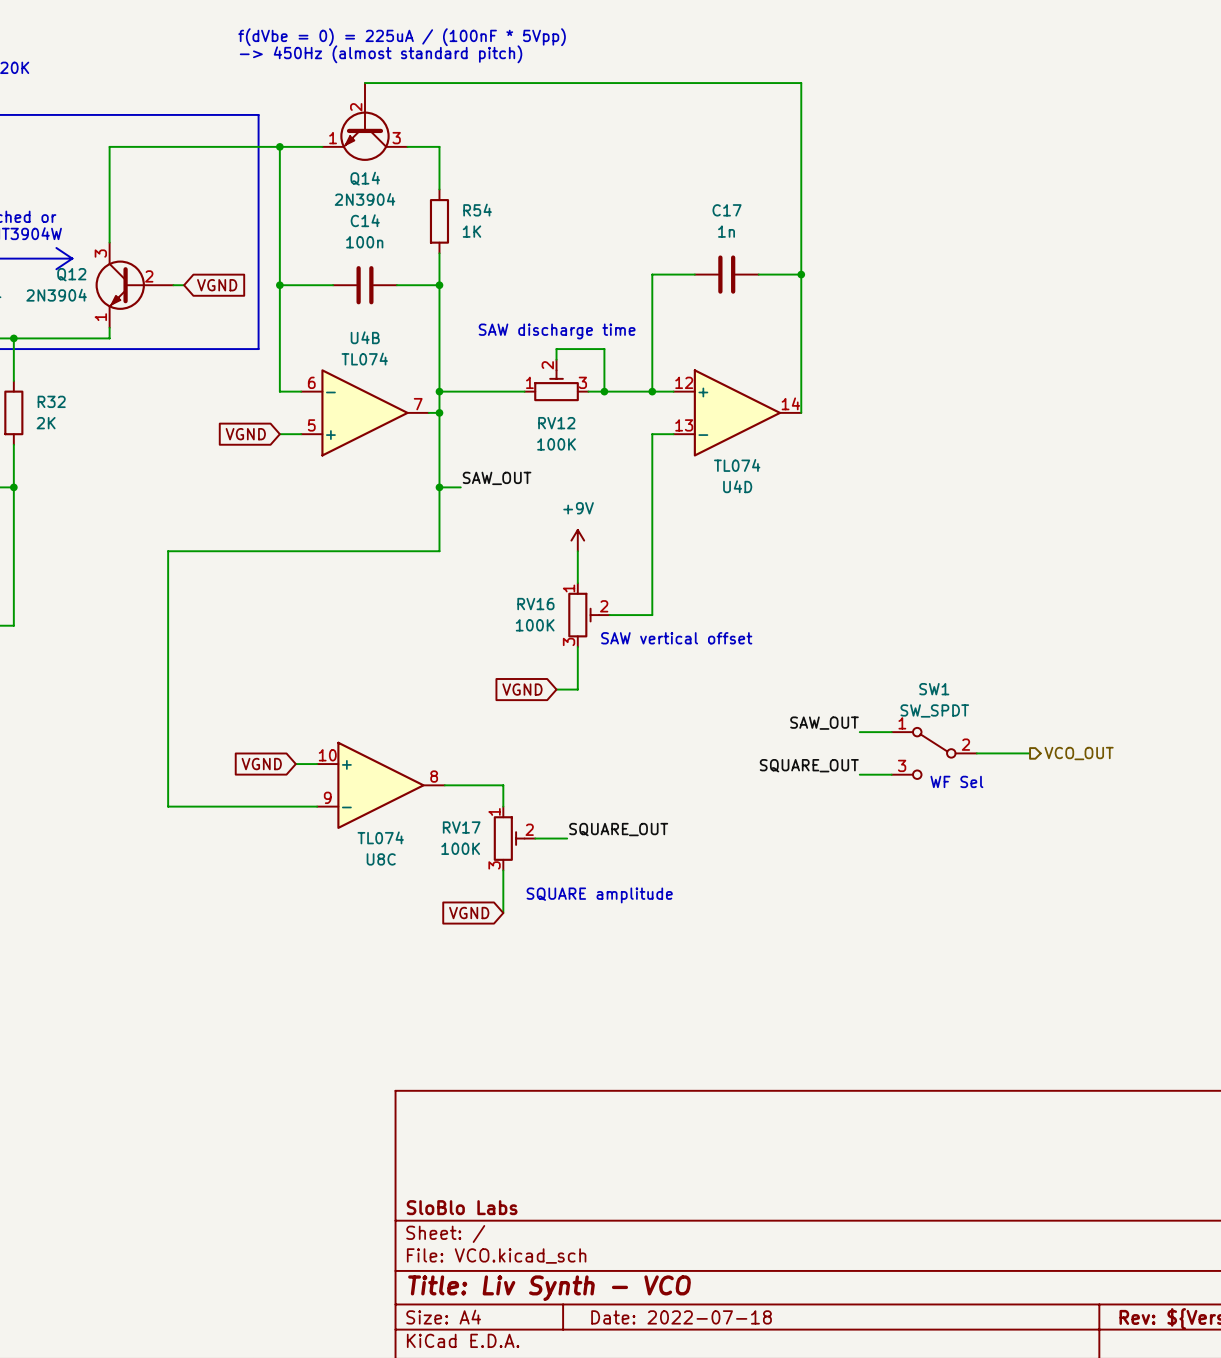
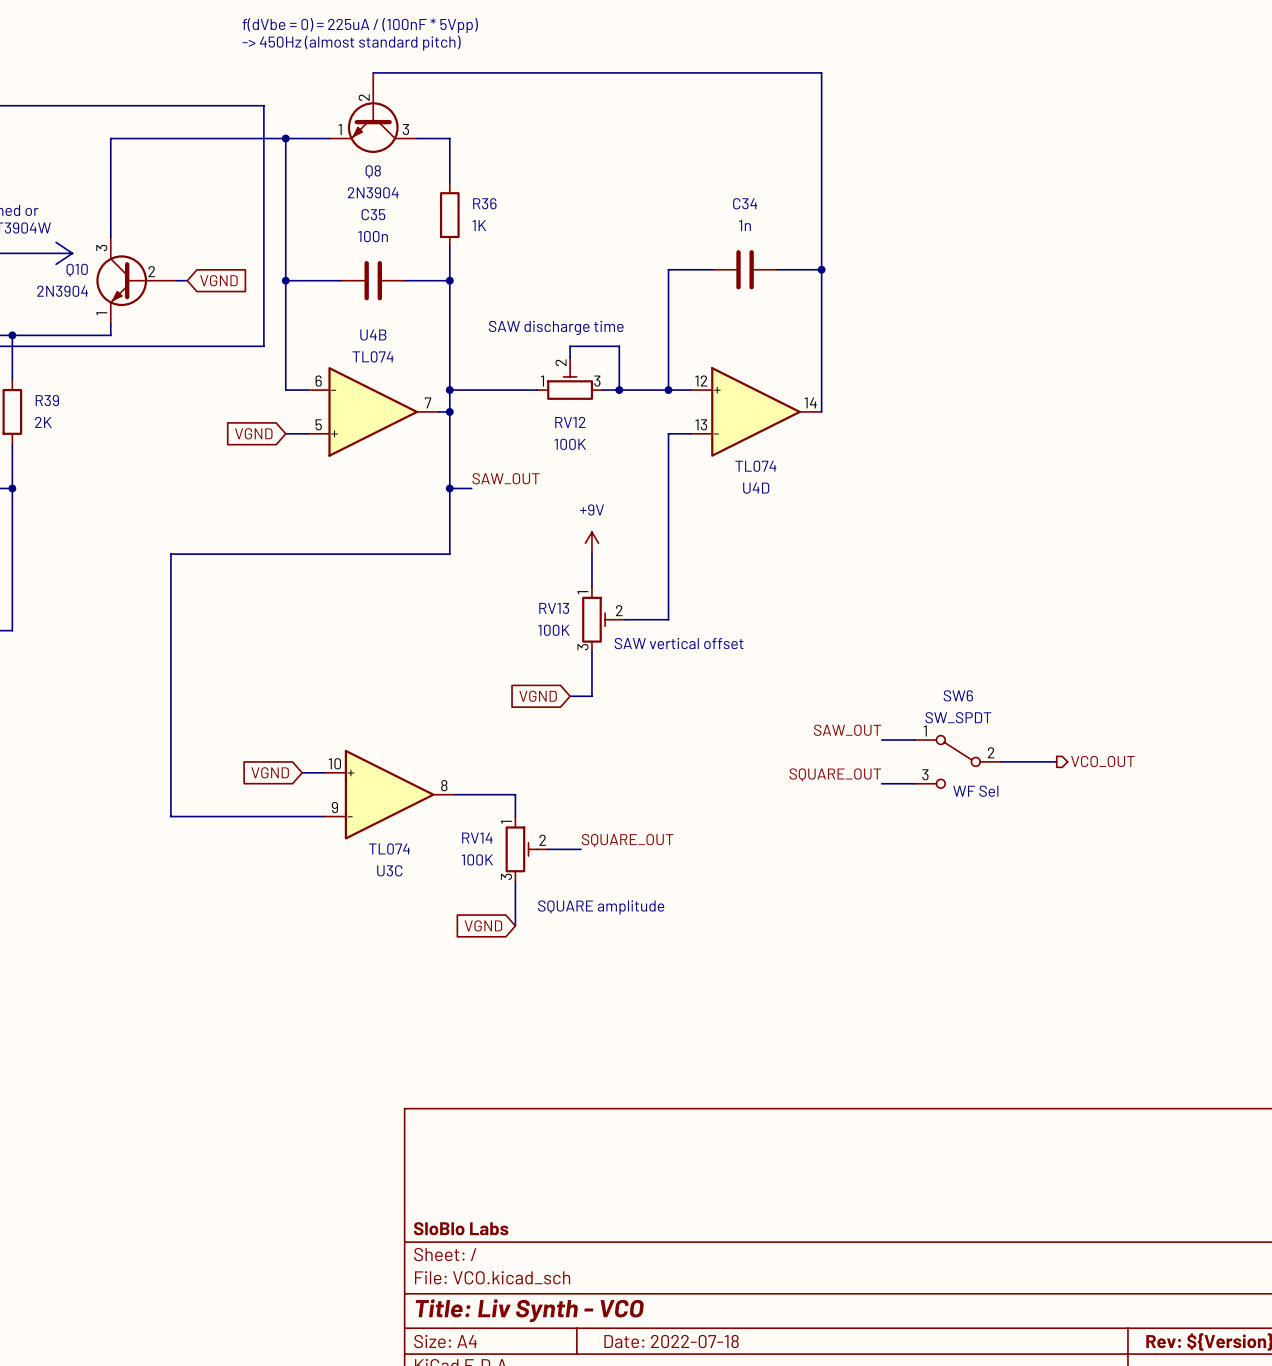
Q14 name: Q14 (365, 178) -> Q8 (373, 171)
R54 name: R54 (477, 210) -> R36 (484, 203)
C17 name: C17 (727, 210) -> C34 (745, 203)
C14 name: C14 (365, 220) -> C35 (373, 214)
Q12 name: Q12 (71, 274) -> Q10 (77, 270)
R32 name: R32 (51, 401) -> R39 (47, 400)
RV16 name: RV16 (535, 604) -> RV13 (554, 608)
SW1 name: SW1 (934, 689) -> SW6 (958, 695)
RV17 name: RV17 (461, 827) -> RV14 (477, 838)
U8C name: U8C (381, 859) -> U3C (389, 870)

